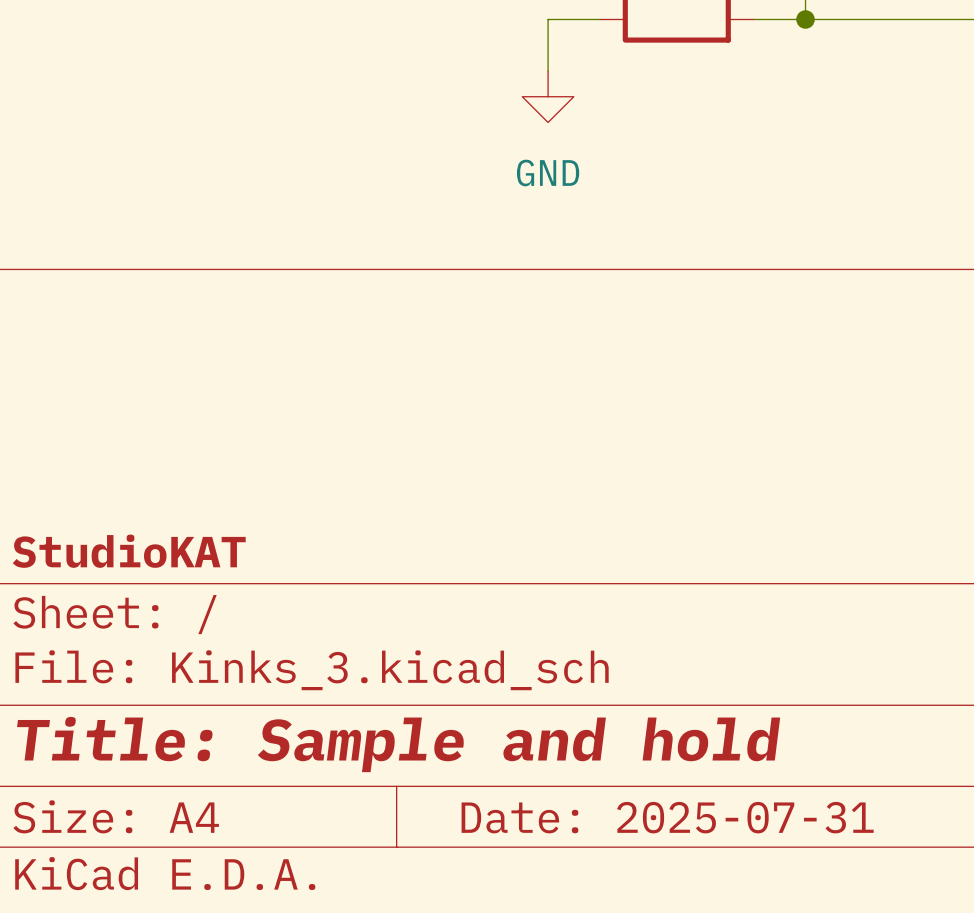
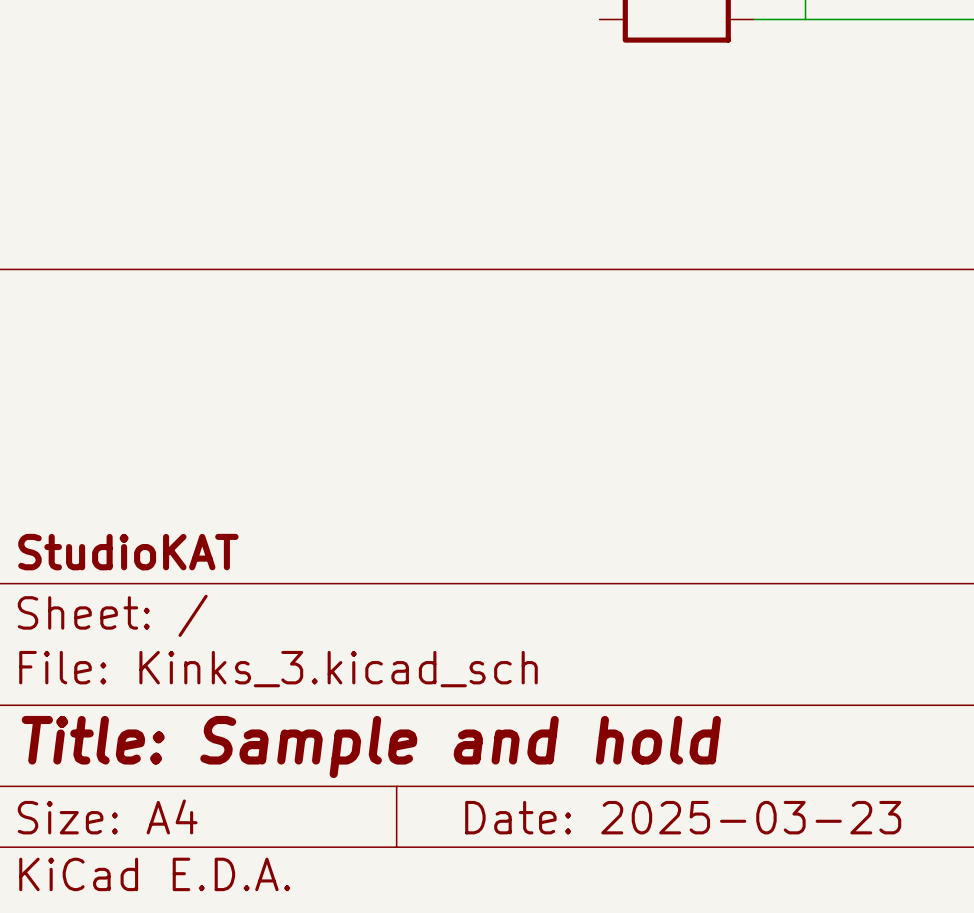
wire: (599, 19) (548, 19) (548, 70) -> none
junction: (805, 19) -> none
power symbol: GND (548, 96) -> none
title block: Date: 2025-07-31 (667, 817) -> Date: 2025-03-23 (683, 817)

